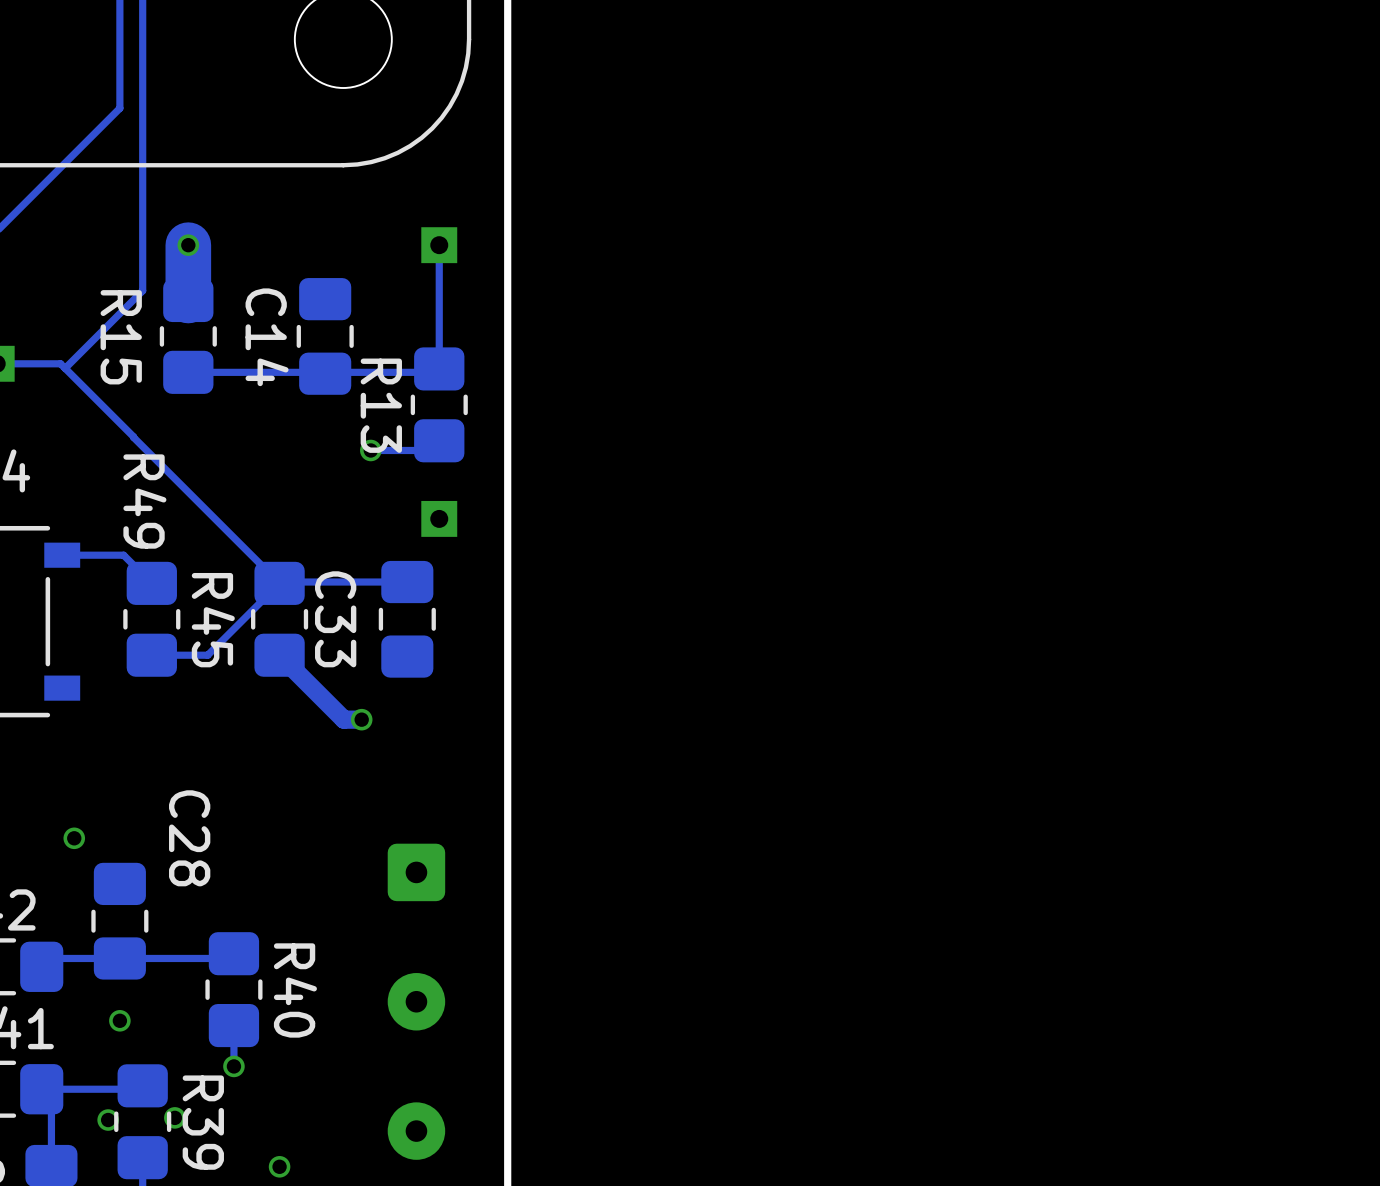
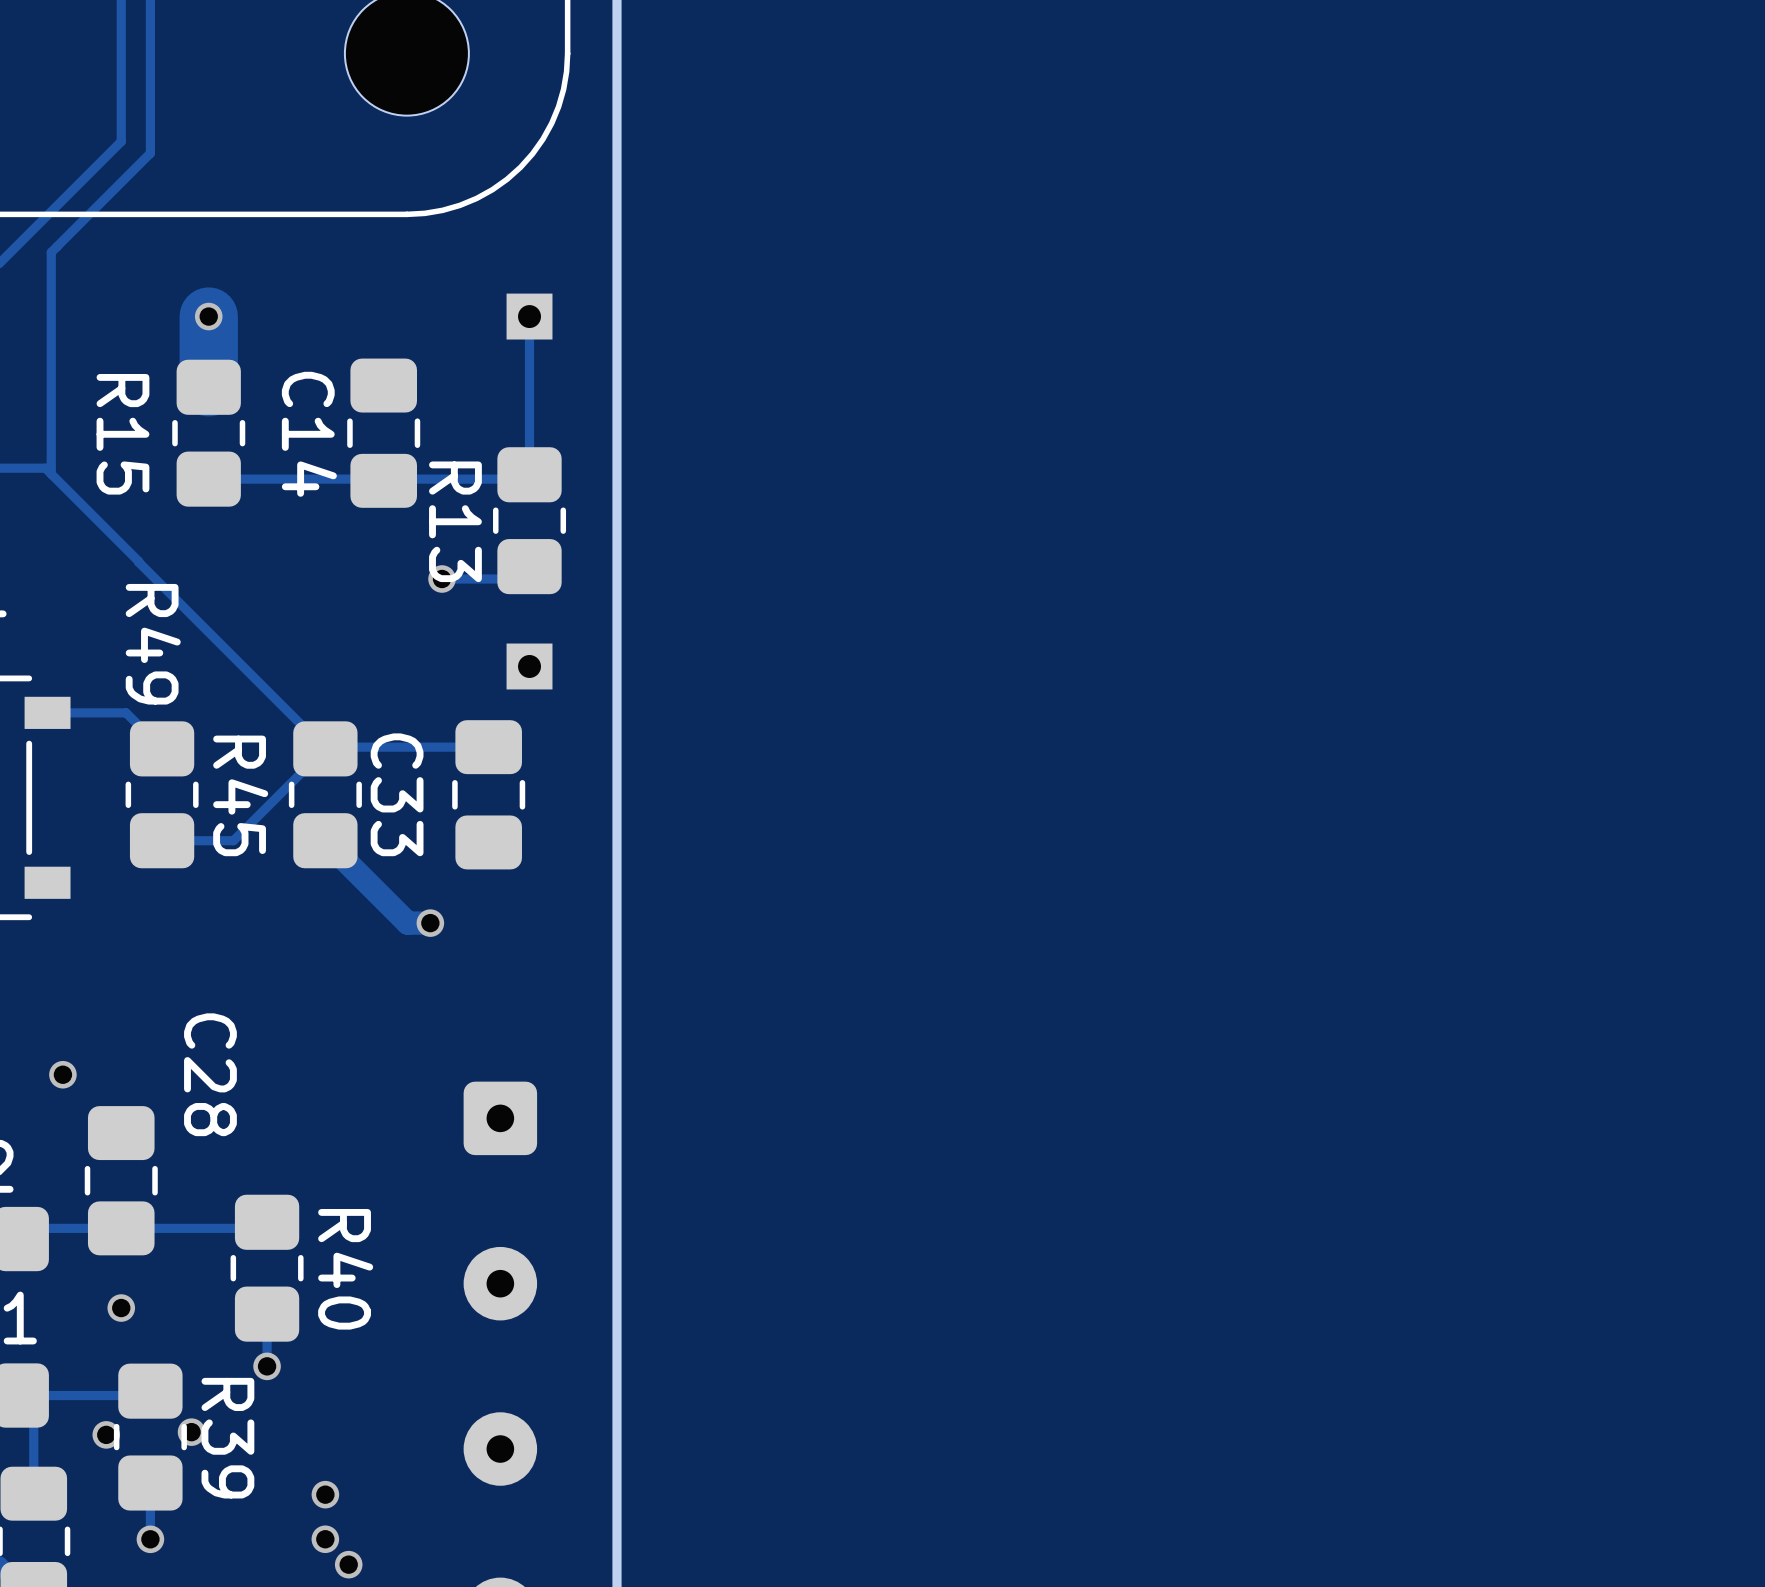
track: (142, 117) (142, 290) (65, 368) -> (150, 153) (51, 252) (51, 474)

